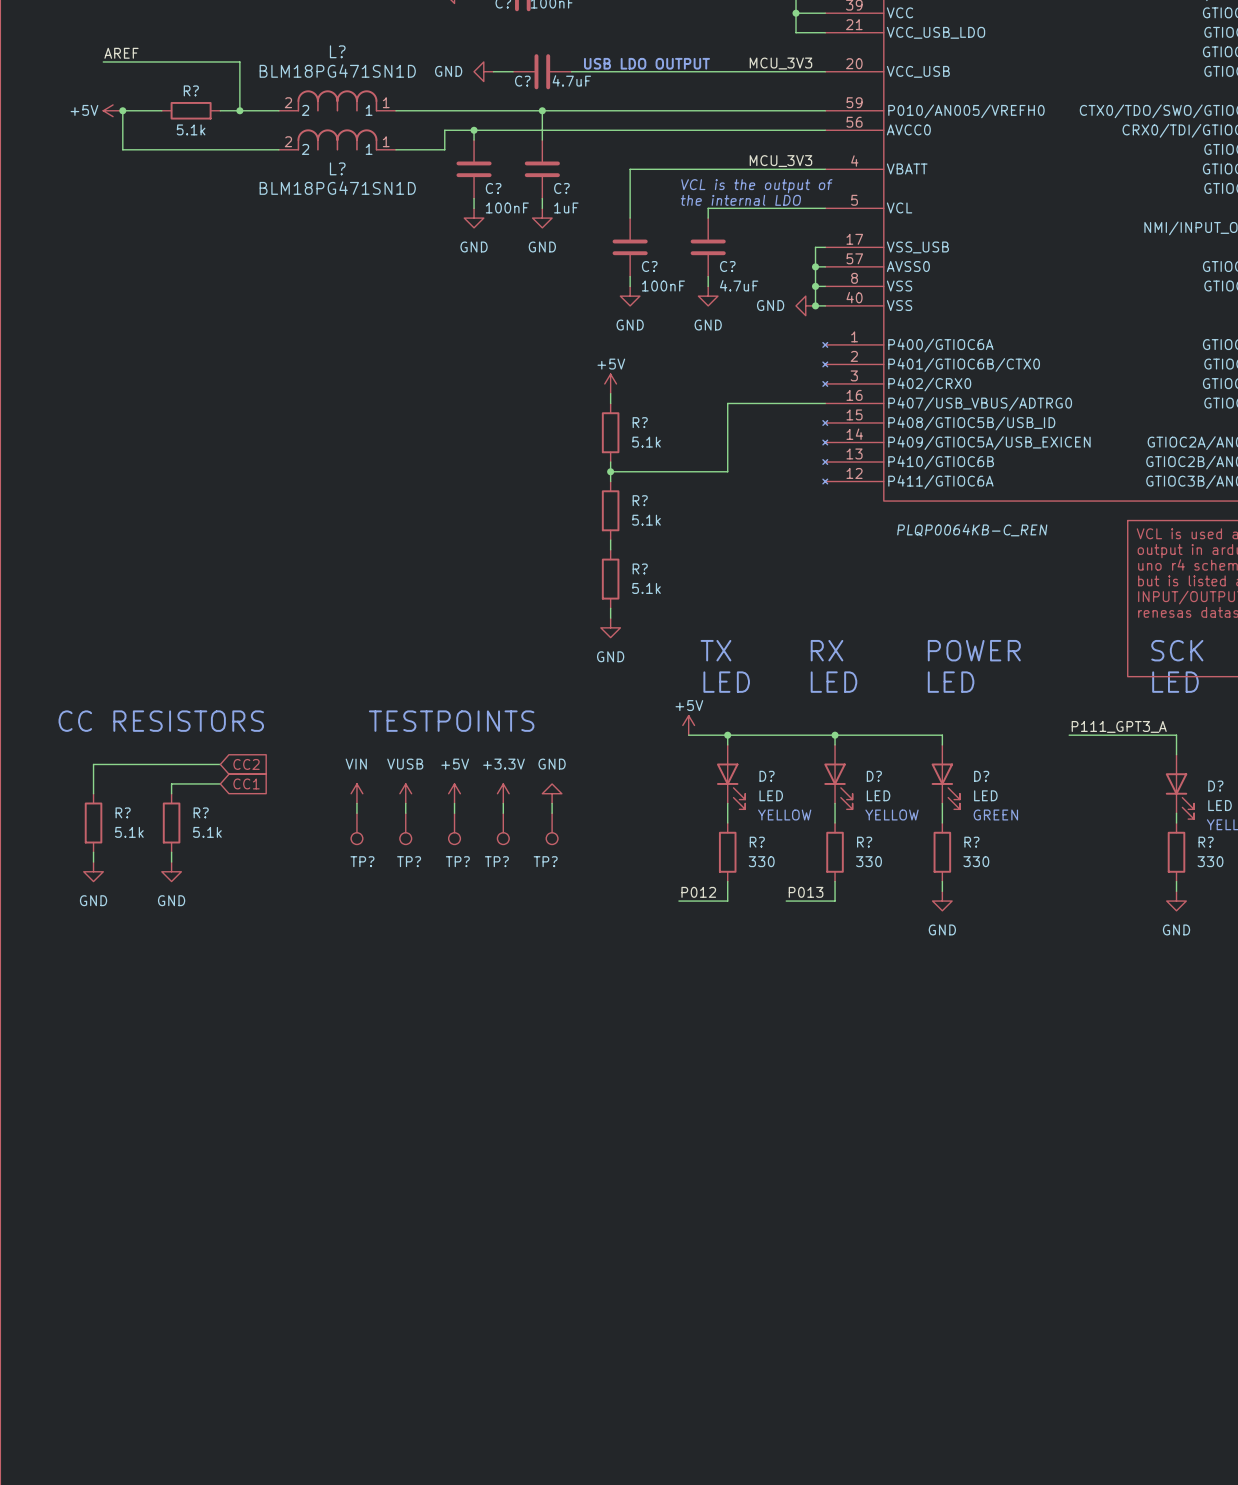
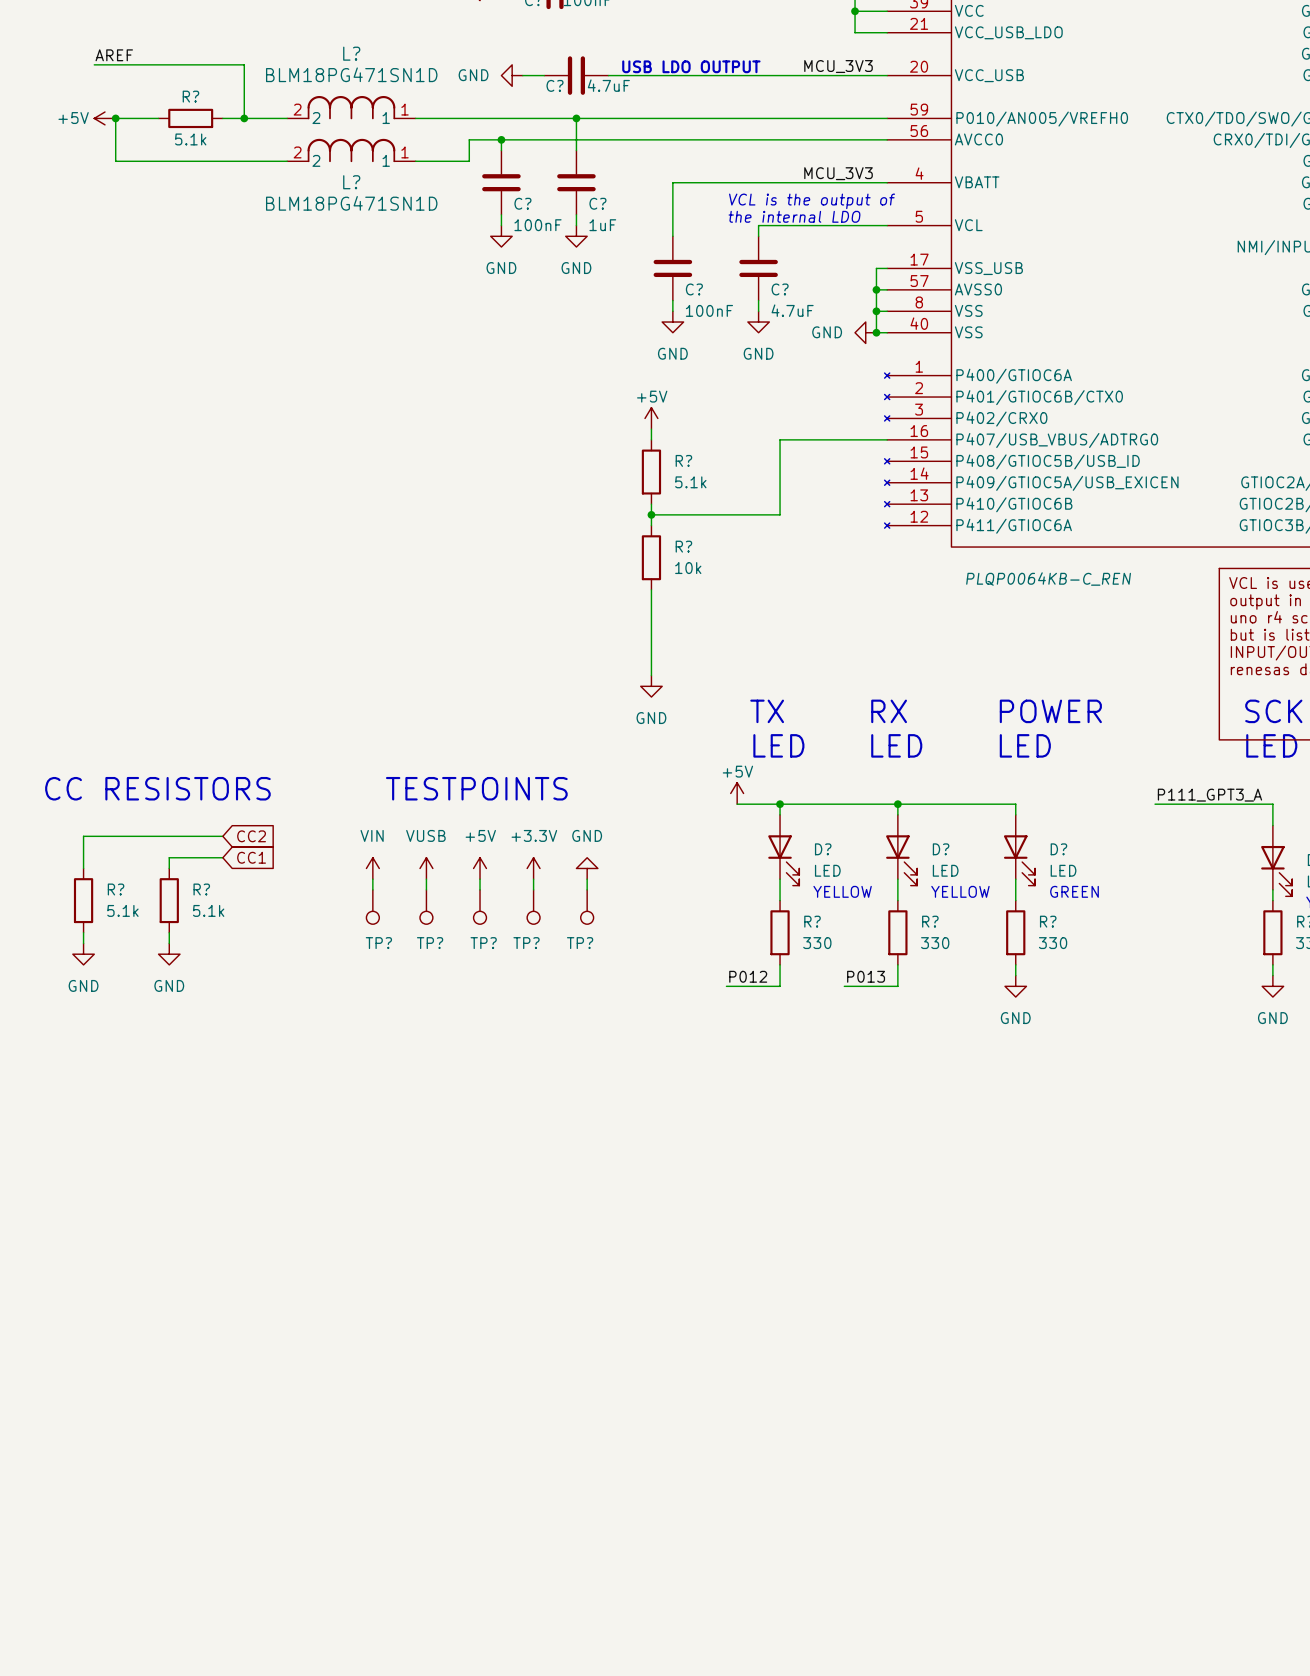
R? value: 5.1k (646, 520) -> 10k (688, 568)
wire: none -> (651, 600) (651, 664)
R?: 5.1k (610, 579) -> none

